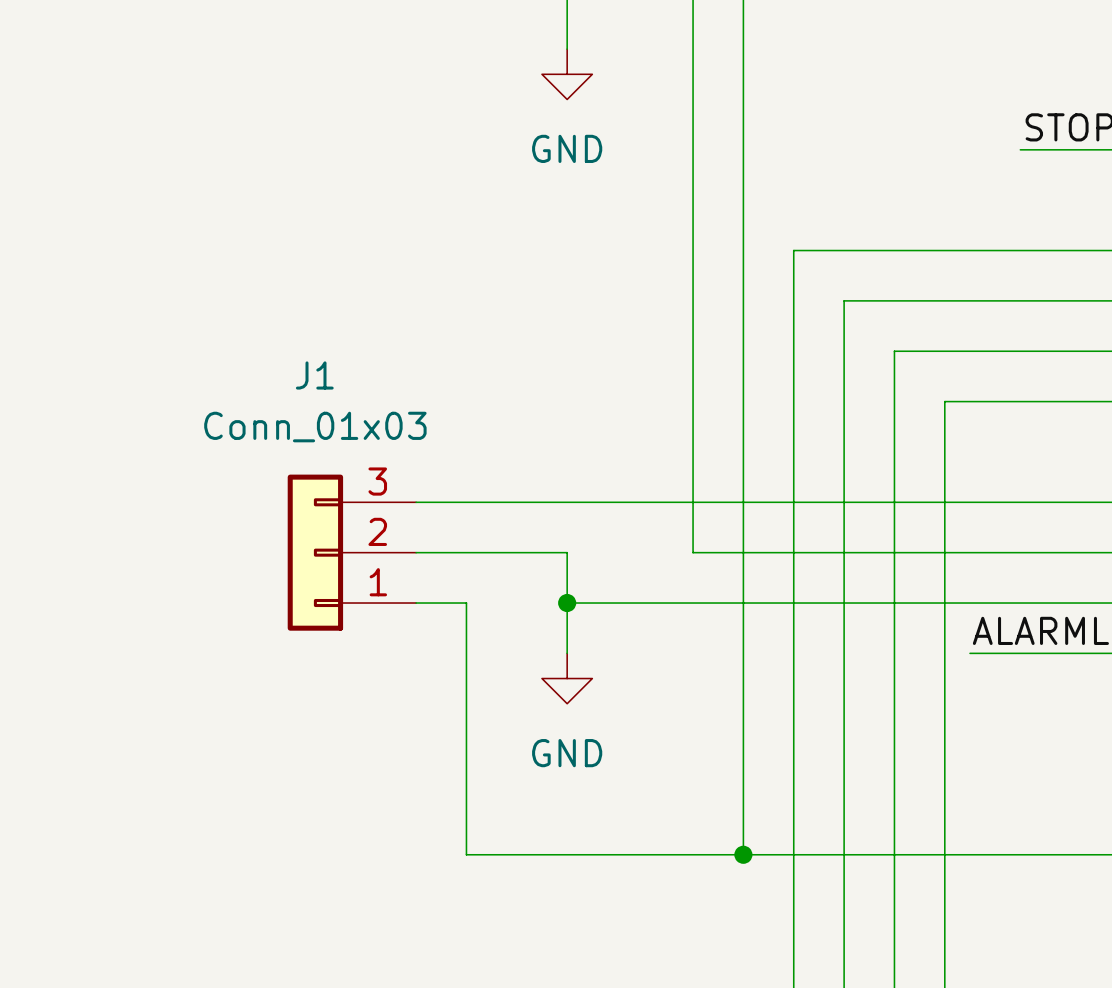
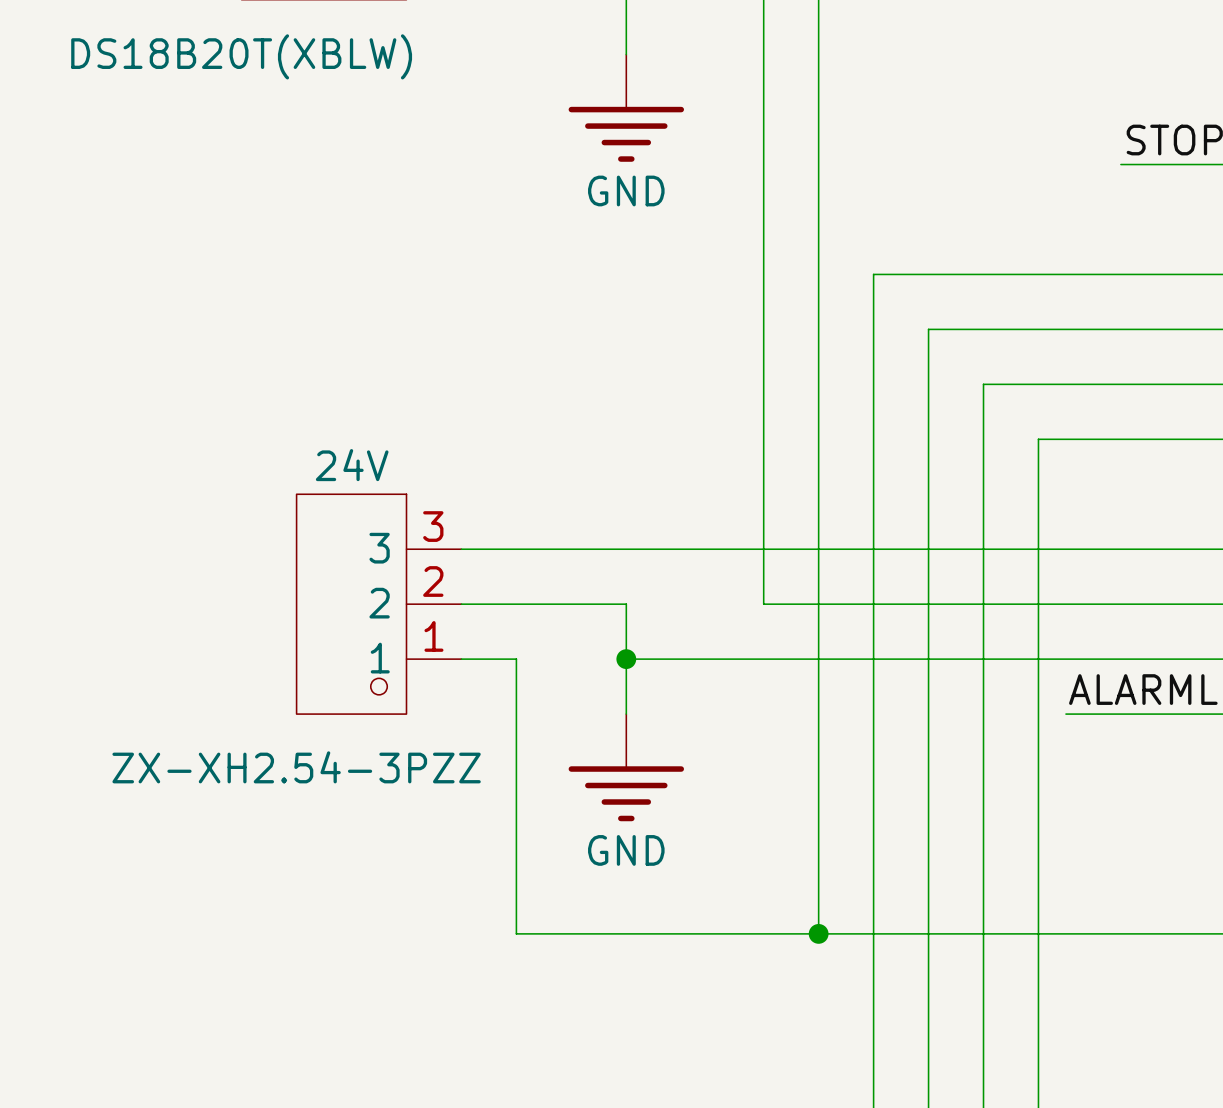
part value: none -> DS18B20T(XBLW) (241, 56)
power symbol: GND (567, 74) -> none
power symbol: none -> GND (626, 108)
24V: none -> ZX-XH2.54-3PZZ (379, 604)
J1: Conn_01x03 (351, 552) -> none
power symbol: GND (567, 678) -> none
power symbol: none -> GND (626, 767)

